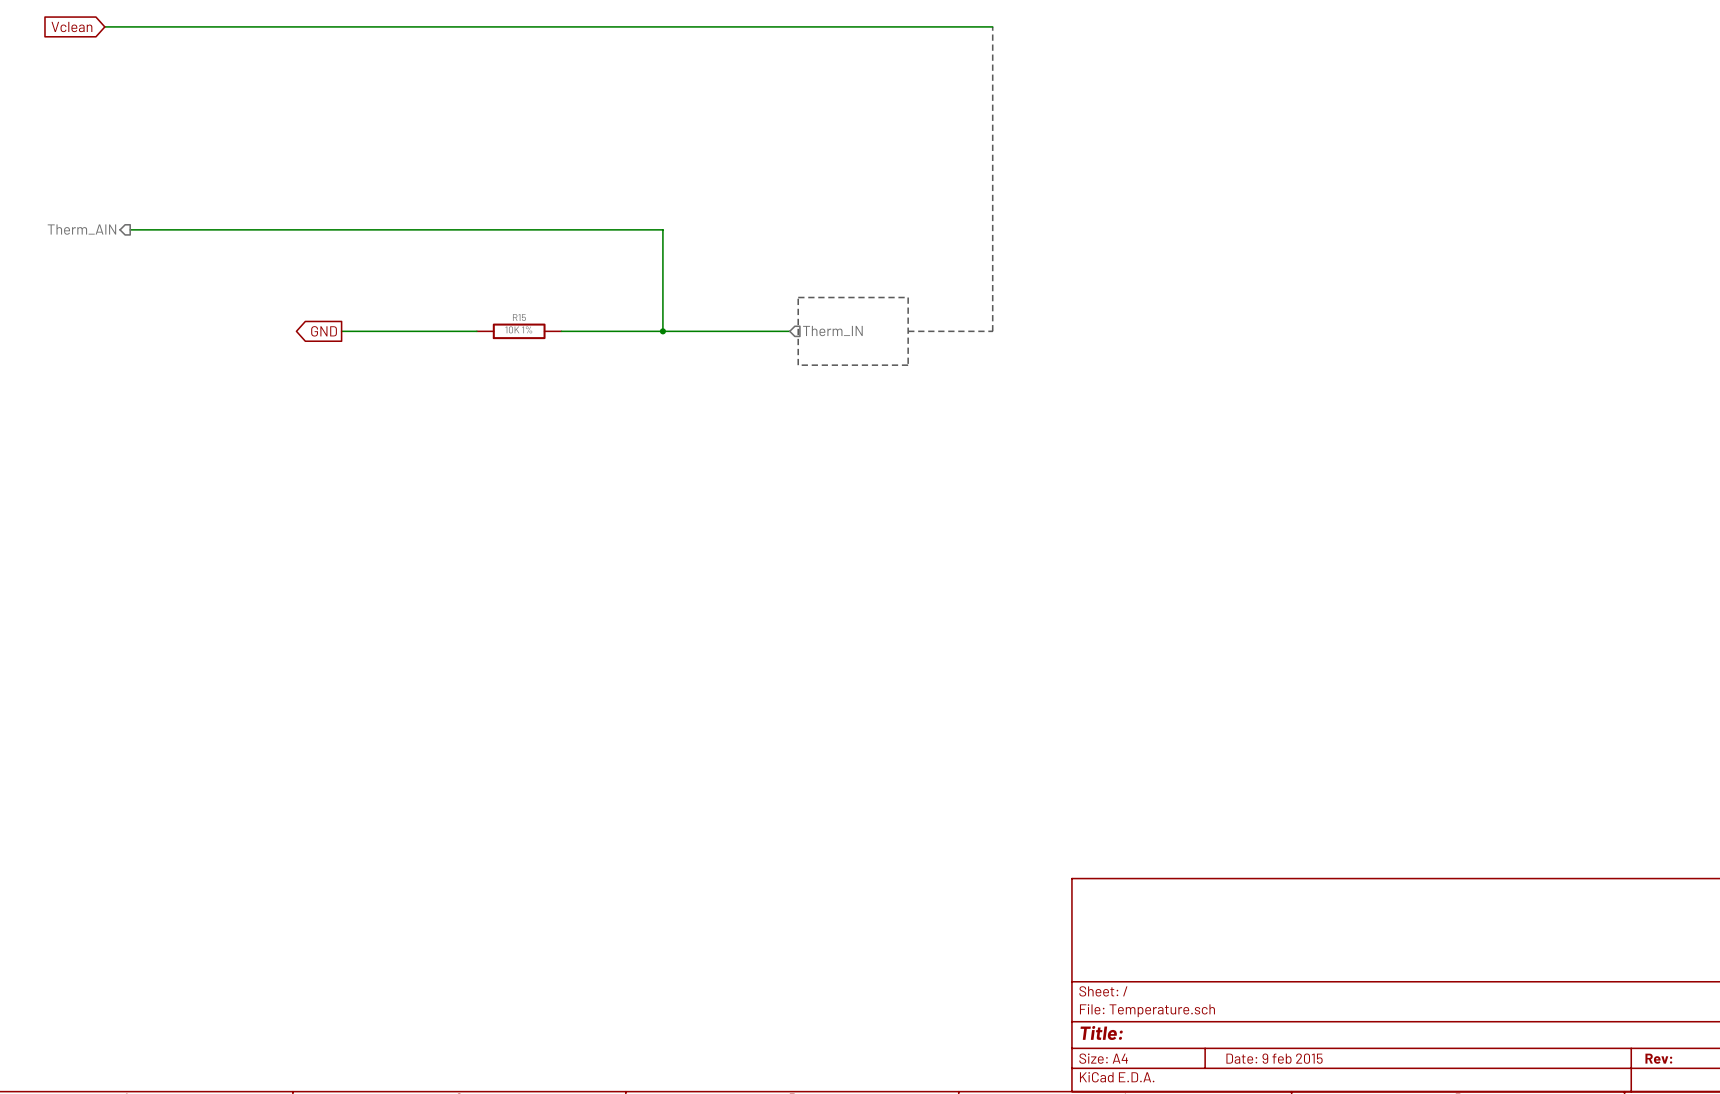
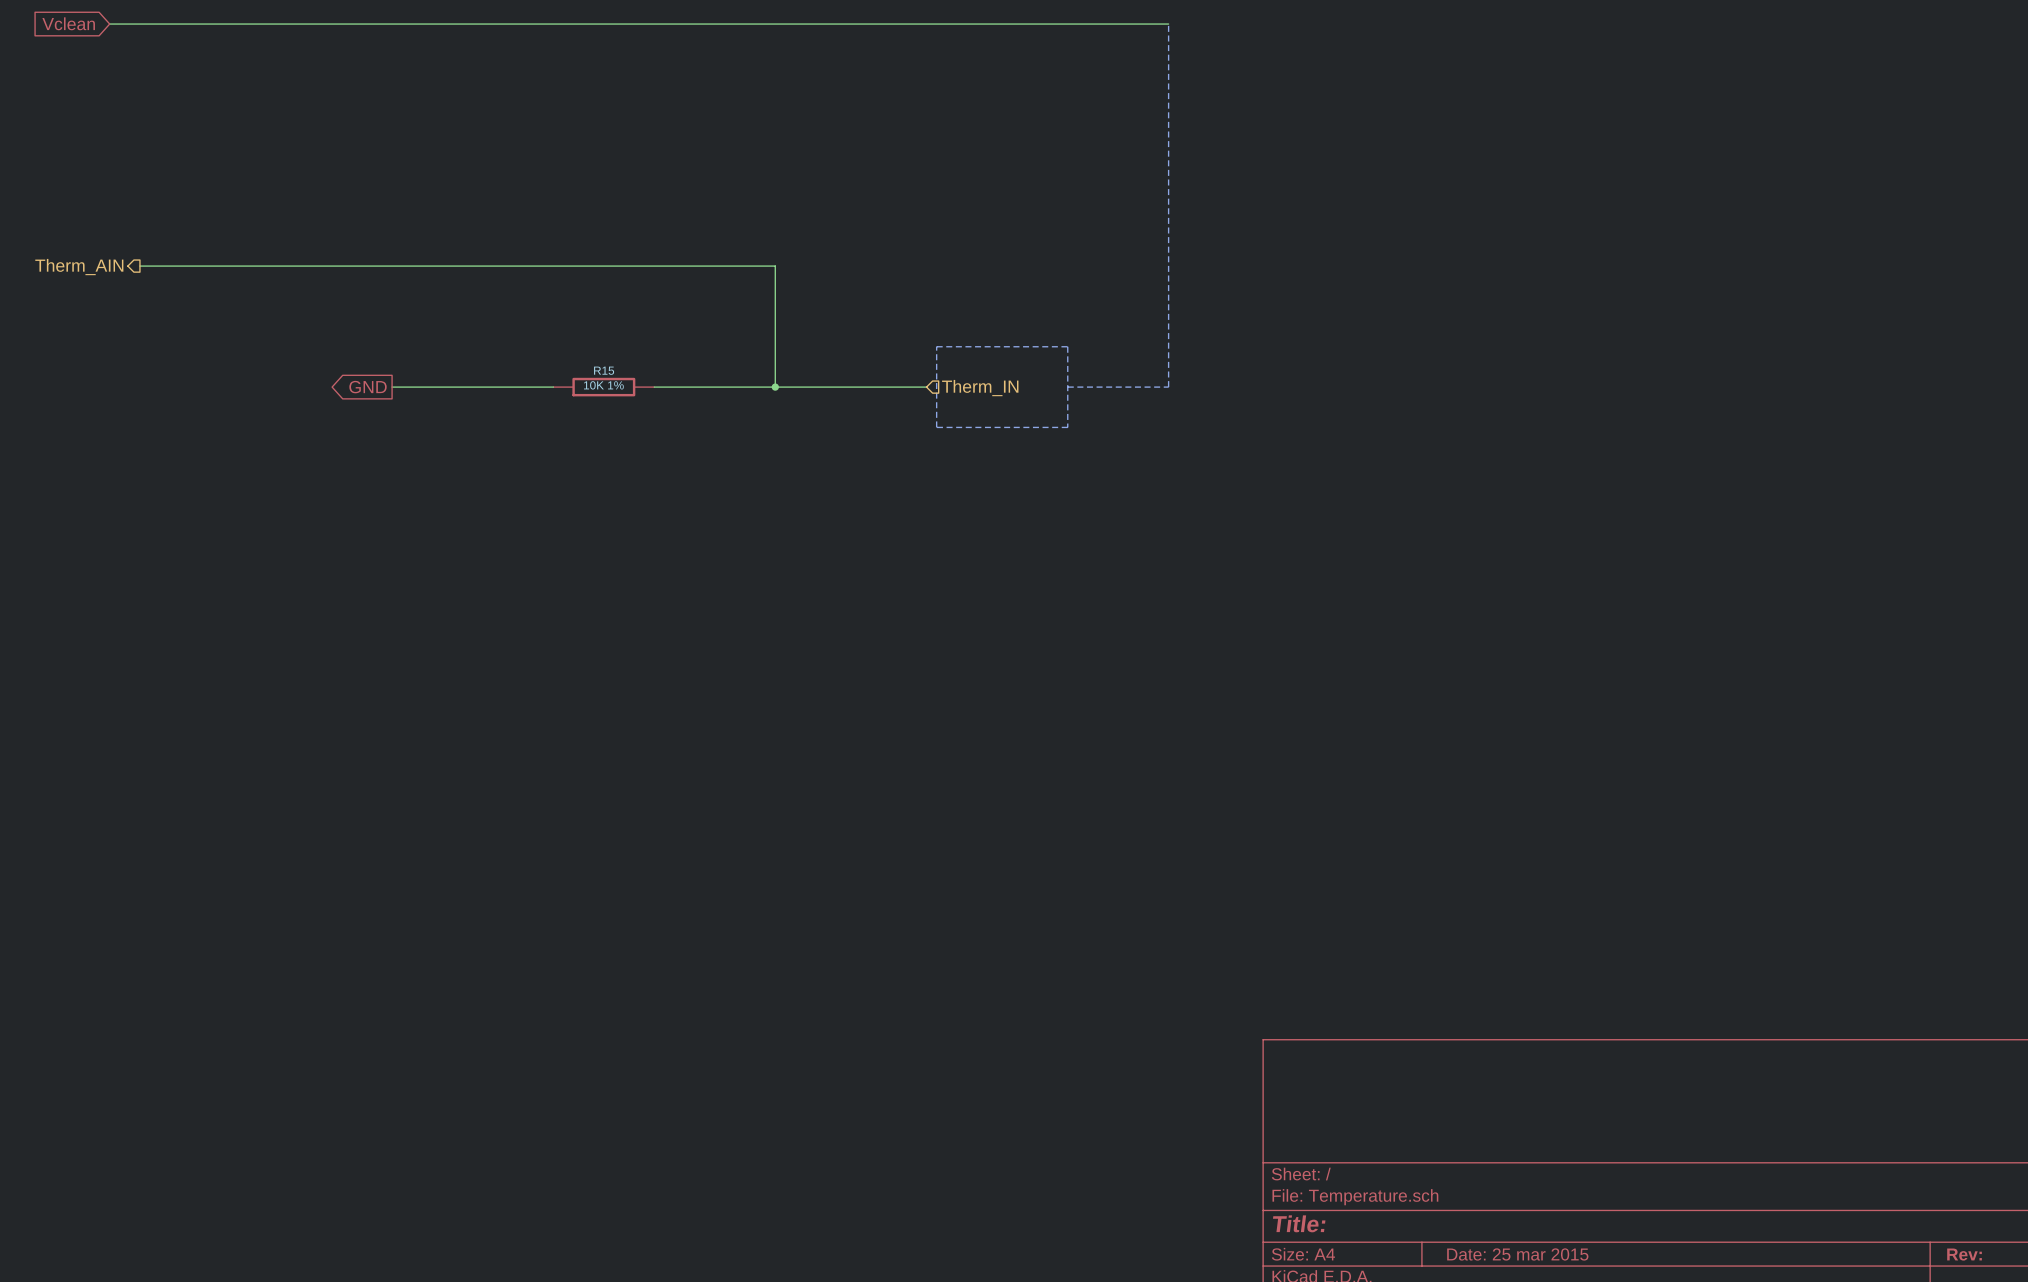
title block: Date: 9 feb 2015 (1274, 1058) -> Date: 25 mar 2015 (1517, 1254)

